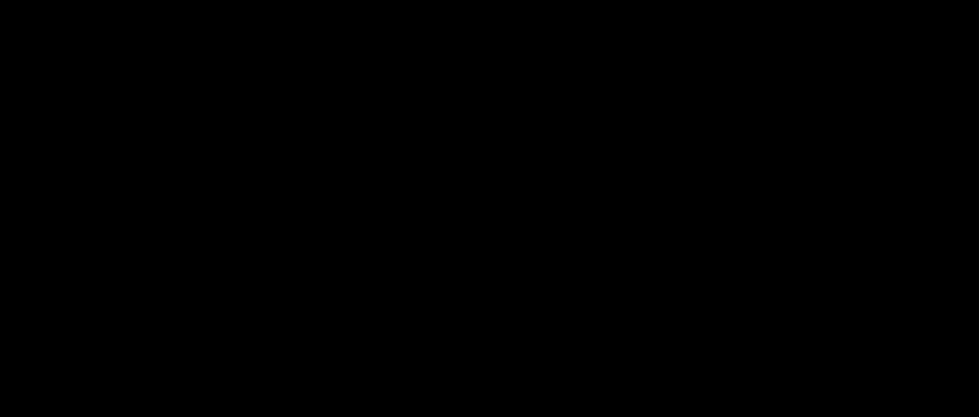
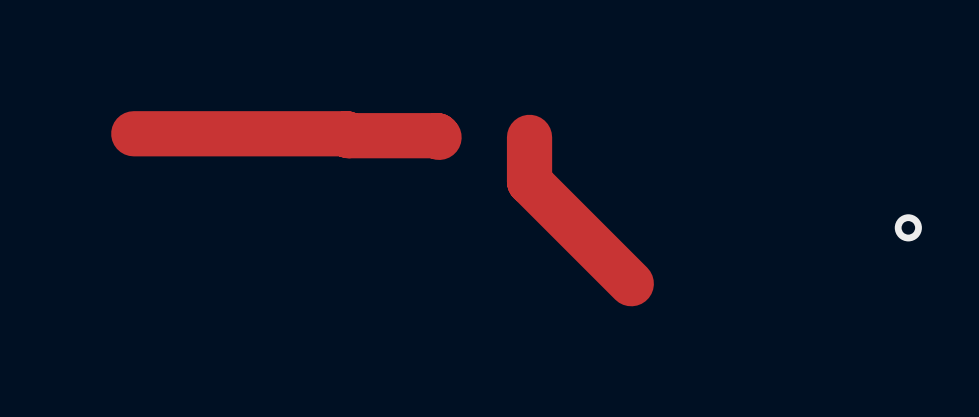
top track: none -> (133, 133) (346, 133) (348, 135) (437, 135) (439, 137)
top track: none -> (529, 137) (529, 181) (631, 283)
via: none -> (908, 227)

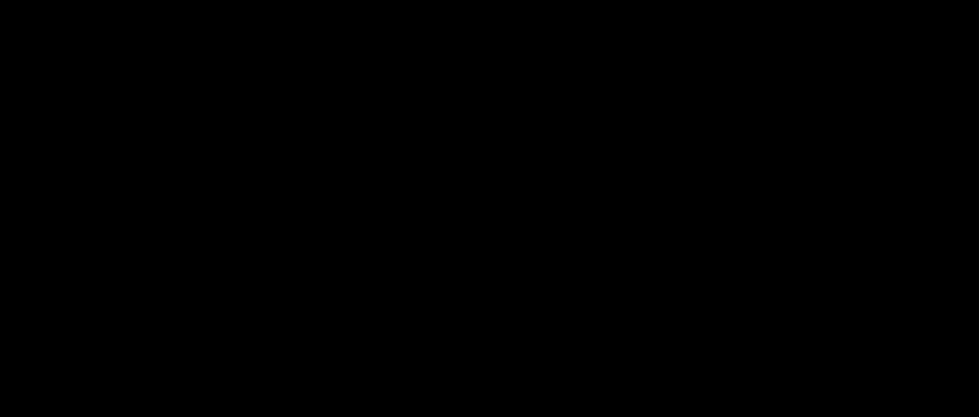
top track: (133, 133) (346, 133) (348, 135) (437, 135) (439, 137) -> none
top track: (529, 137) (529, 181) (631, 283) -> none
via: (908, 227) -> none

